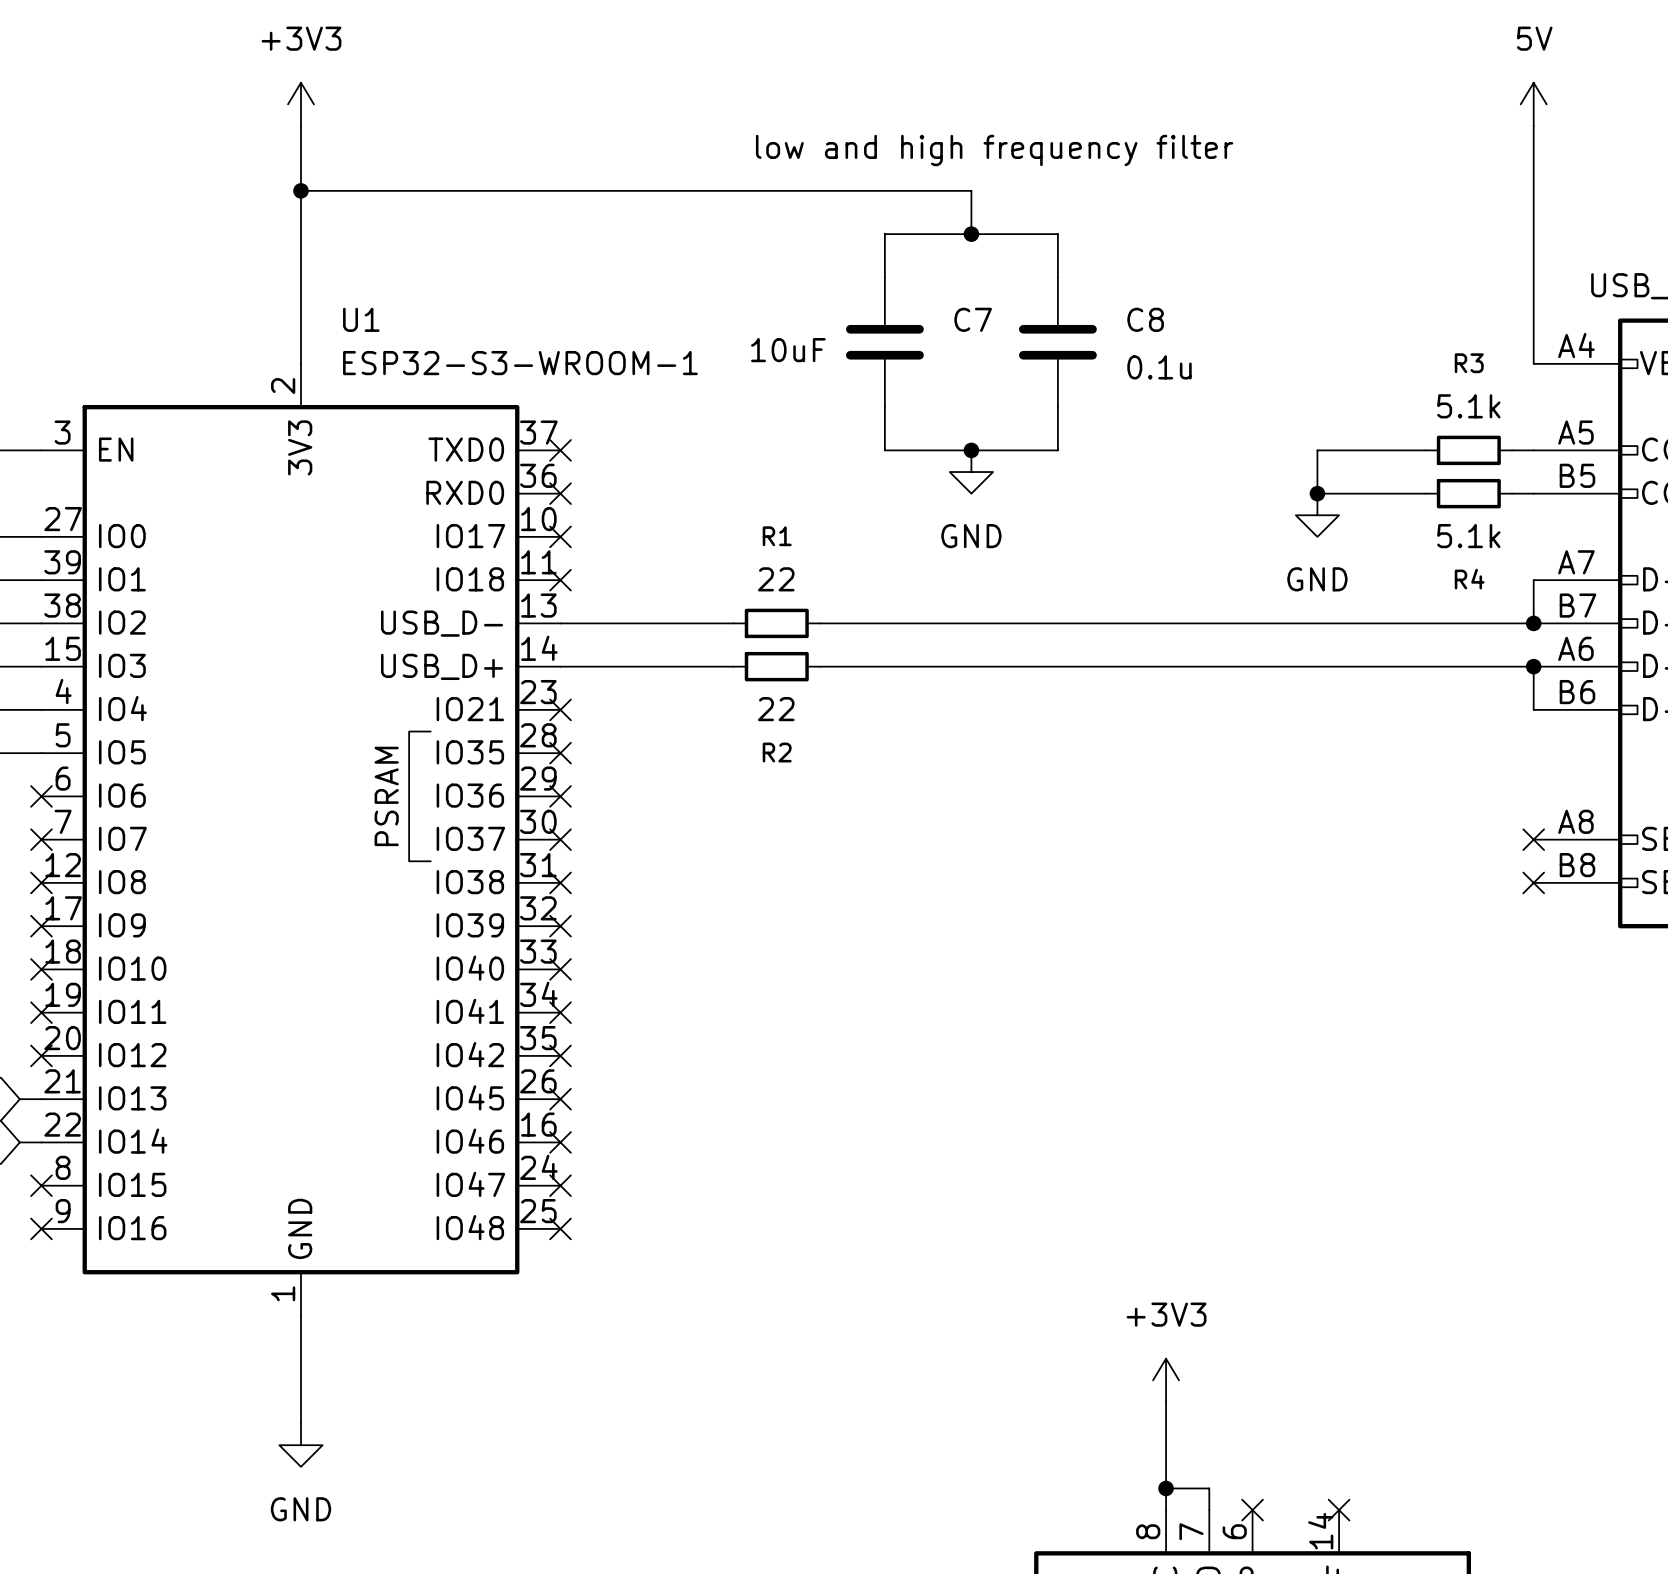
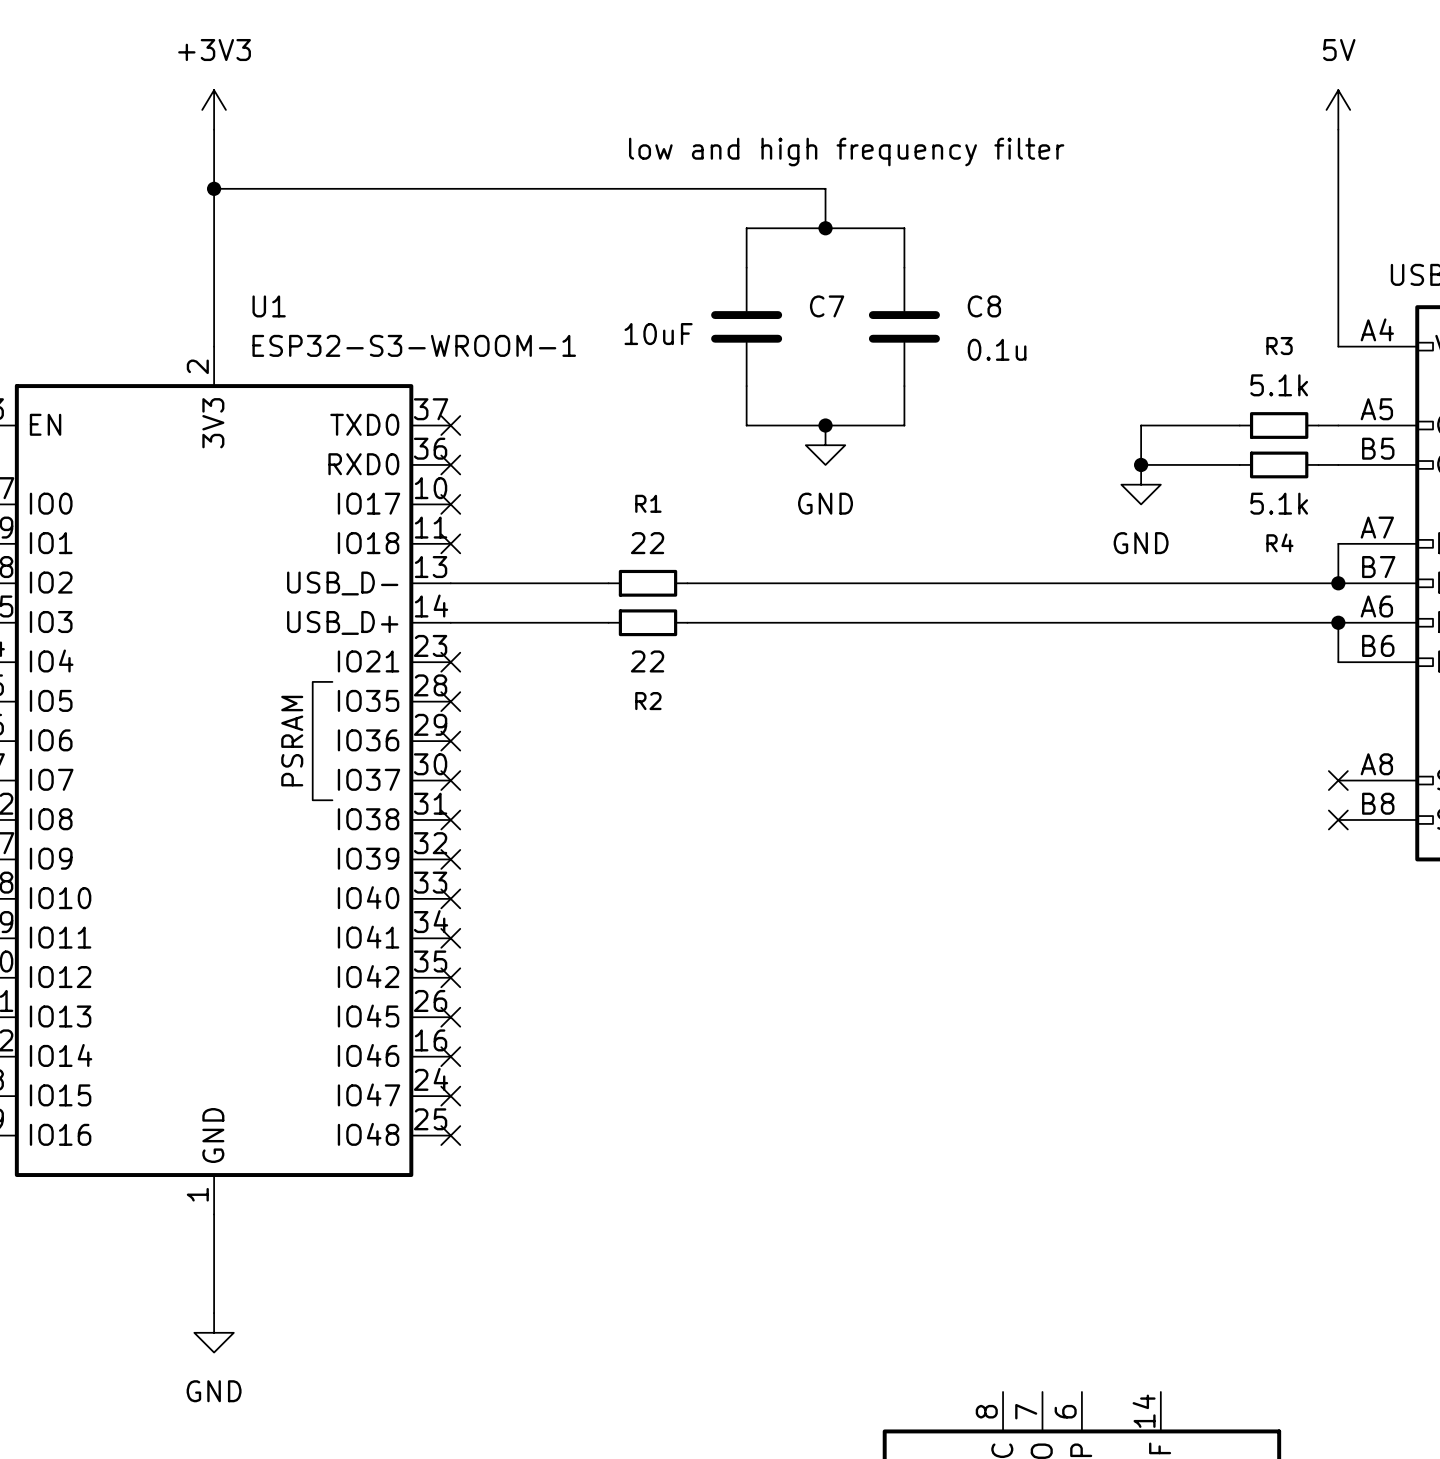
power symbol: +3V3 (1166, 1380) -> none
wire: (1166, 1401) (1166, 1510) -> none
wire: (1166, 1488) (1209, 1488) (1209, 1510) -> none
junction: (1166, 1488) -> none
no-connect mark: (1252, 1510) -> none
no-connect mark: (1339, 1510) -> none

